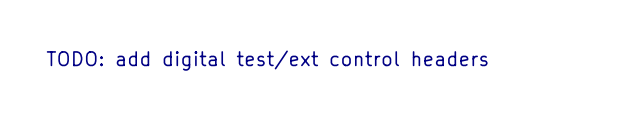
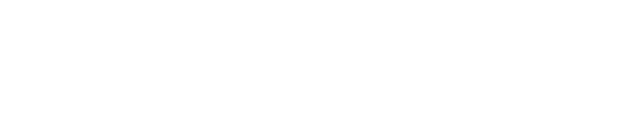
text: TODO: add digital test/ext control headers (267, 60) -> none

